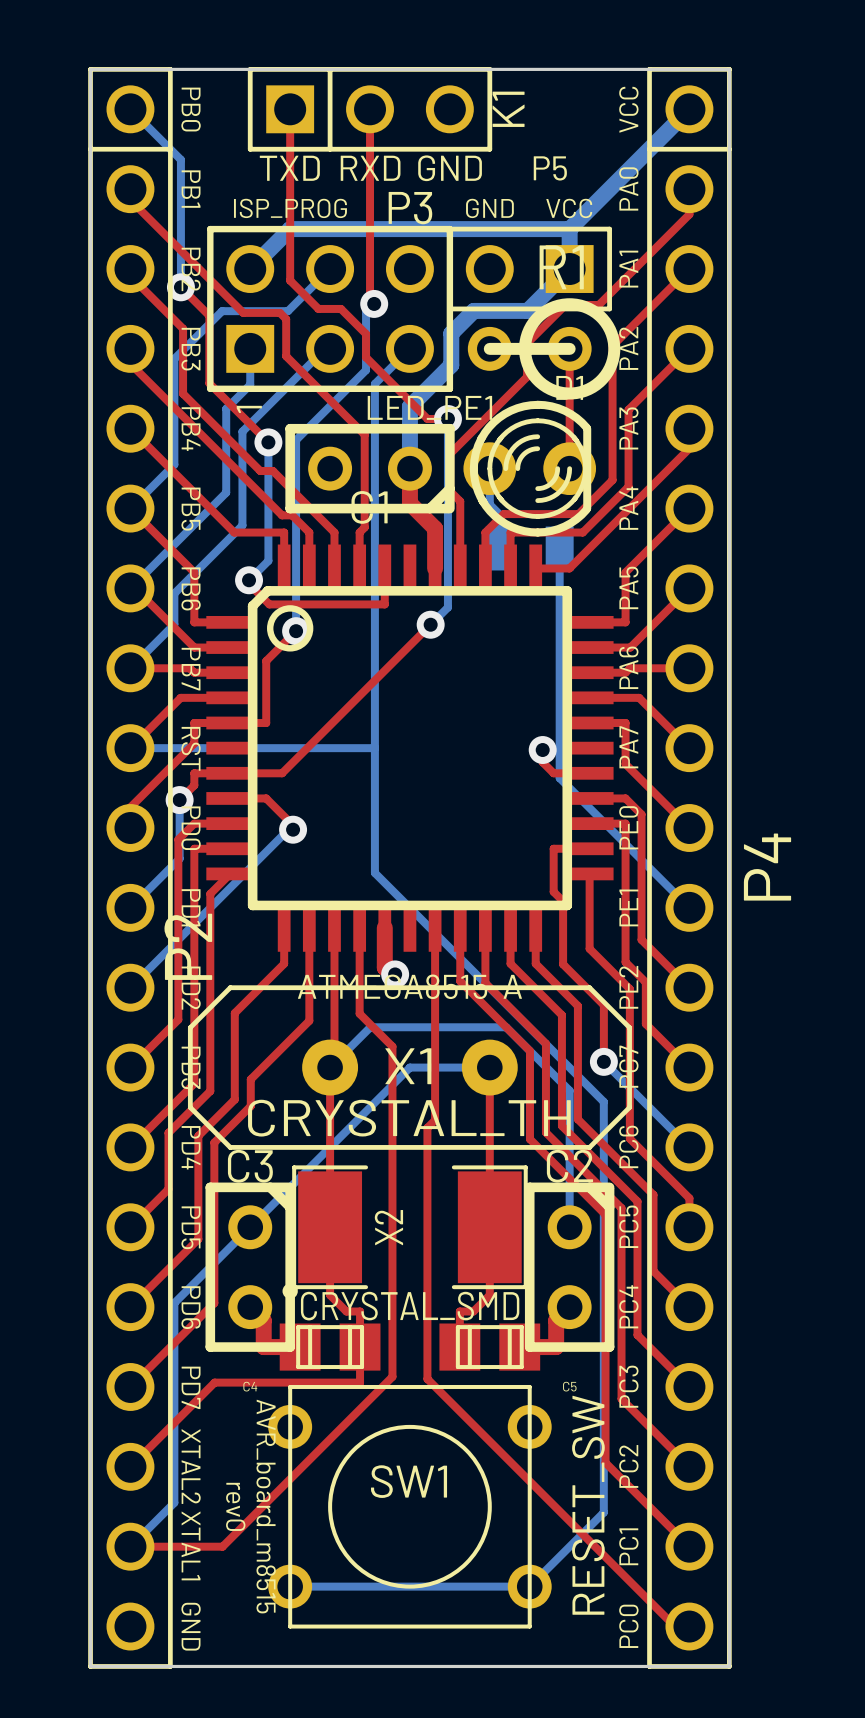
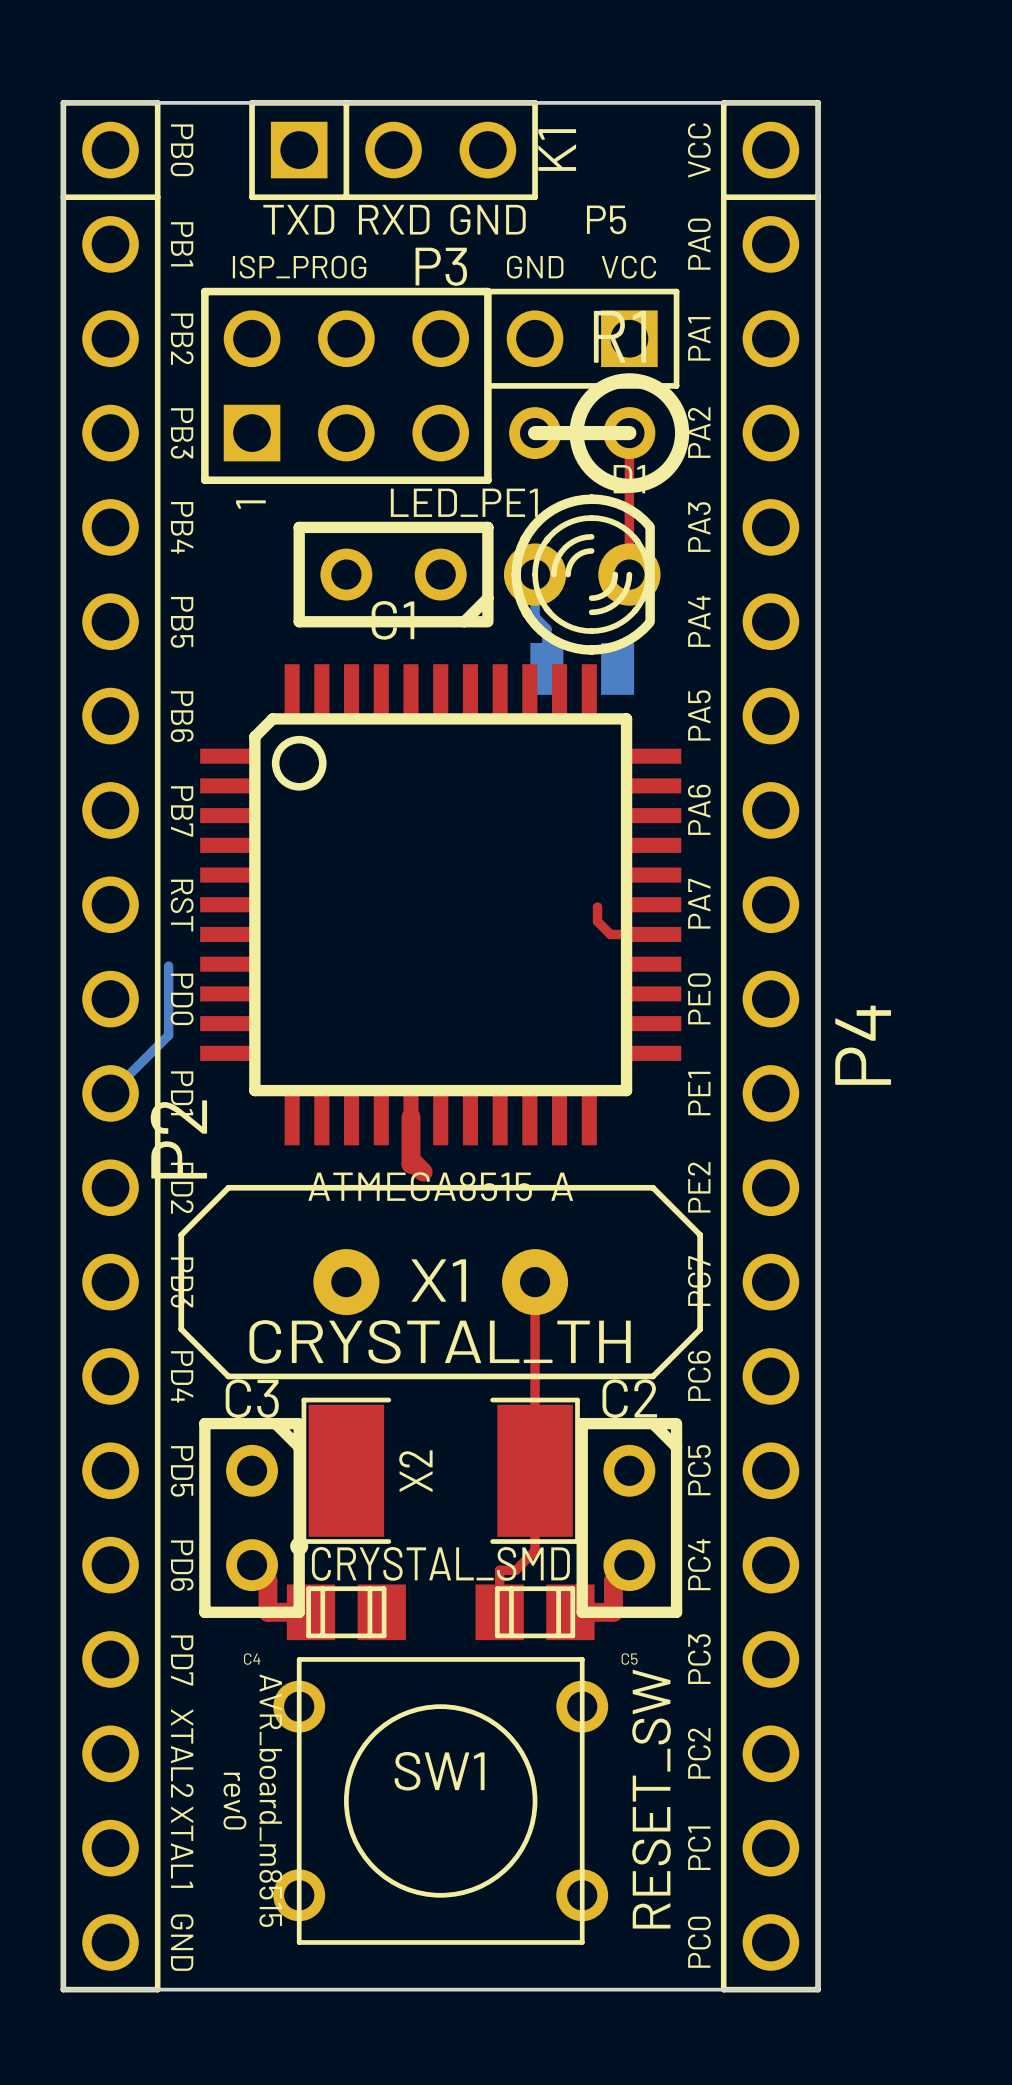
bottom track: (130, 109) (180, 159) (180, 287) -> none
top track: (290, 109) (290, 280) (318, 308) (340, 308) (366, 333) (366, 357) (427, 419) (447, 419) -> none
top track: (370, 109) (370, 299) (374, 303) -> none
bottom track: (689, 109) (569, 229) -> none
top track: (130, 189) (130, 200) (243, 312) (280, 312) (286, 319) (286, 356) (364, 434) (364, 527) (359, 532) (359, 568) -> none
top track: (689, 189) (689, 214) (598, 304) (565, 304) (527, 343) (527, 376) (450, 453) (450, 491) (460, 501) (460, 568) -> none
bottom track: (569, 229) (290, 229) (250, 269) -> none
bottom track: (569, 229) (569, 269) (527, 310) (473, 310) (451, 333) (451, 365) (409, 406) (409, 468) -> none
top track: (130, 269) (130, 276) (183, 328) (183, 393) (260, 471) (272, 471) (334, 532) (334, 568) -> none
bottom track: (330, 269) (287, 311) (222, 311) (174, 358) (174, 464) (130, 508) -> none
top track: (689, 269) (612, 345) (612, 480) (578, 514) (503, 514) (485, 532) (485, 568) -> none
top track: (180, 287) (209, 315) (209, 383) (268, 442) -> none
via: (180, 287) -> none
bottom track: (374, 303) (366, 312) (366, 370) (296, 440) (296, 631) -> none
via: (374, 303) -> none
top track: (130, 348) (130, 363) (282, 515) (292, 515) (309, 532) (309, 568) -> none
bottom track: (250, 348) (250, 384) (226, 408) (226, 492) (130, 588) -> none
bottom track: (330, 348) (325, 348) (242, 431) (242, 525) (174, 593) (174, 624) (130, 668) -> none
bottom track: (409, 348) (374, 383) (374, 872) (603, 1101) (603, 1512) (529, 1586) (290, 1586) -> none
top track: (689, 348) (628, 409) (628, 486) (582, 532) (510, 532) (510, 568) -> none
bottom track: (447, 419) (447, 607) (430, 624) -> none
via: (447, 419) -> none
top track: (130, 428) (234, 532) (284, 532) (284, 568) -> none
top track: (689, 428) (689, 448) (569, 568) (535, 568) -> none
bottom track: (268, 442) (268, 560) (249, 580) -> none
via: (268, 442) -> none
top track: (409, 468) (409, 503) (435, 528) (435, 568) -> none
top track: (130, 508) (194, 572) (194, 622) (230, 622) -> none
top track: (689, 508) (625, 572) (625, 622) (589, 622) -> none
bottom track: (559, 548) (559, 778) (689, 907) -> none
top track: (384, 568) (384, 604) (269, 604) (249, 584) (249, 580) -> none
via: (249, 580) -> none
top track: (130, 588) (135, 588) (194, 647) (230, 647) -> none
top track: (689, 588) (630, 647) (589, 647) -> none
top track: (430, 624) (282, 773) (194, 773) (194, 785) (179, 800) -> none
via: (430, 624) -> none
top track: (296, 631) (266, 661) (266, 722) (194, 722) (194, 743) (130, 807) (130, 828) -> none
via: (296, 631) -> none
top track: (130, 668) (189, 668) (194, 672) (230, 672) -> none
top track: (689, 668) (629, 668) (625, 672) (589, 672) -> none
top track: (230, 697) (180, 697) (130, 748) -> none
top track: (589, 697) (639, 697) (689, 748) -> none
top track: (589, 722) (625, 722) (625, 764) (689, 828) -> none
bottom track: (130, 748) (374, 748) -> none
via: (542, 750) -> none
top track: (230, 798) (266, 798) (293, 825) (293, 829) -> none
top track: (589, 798) (625, 798) (641, 814) (641, 939) (689, 987) -> none
via: (179, 800) -> none
top track: (230, 823) (194, 823) (178, 839) (178, 1019) (130, 1067) -> none
top track: (589, 823) (625, 823) (625, 962) (645, 982) (645, 1023) (689, 1067) -> none
bottom track: (293, 829) (288, 829) (130, 987) -> none
via: (293, 829) -> none
top track: (230, 848) (194, 848) (194, 1083) (130, 1147) -> none
top track: (589, 848) (553, 848) (553, 891) (563, 901) (563, 964) (603, 1005) (603, 1061) -> none
top track: (230, 873) (210, 893) (210, 1091) (168, 1132) (168, 1189) (130, 1227) -> none
top track: (589, 873) (589, 948) (629, 989) (629, 1138) (689, 1198) (689, 1227) -> none
top track: (284, 927) (284, 963) (234, 1013) (234, 1099) (198, 1136) (198, 1239) (130, 1307) -> none
top track: (309, 927) (309, 1020) (250, 1079) (250, 1106) (214, 1142) (214, 1303) (130, 1386) -> none
top track: (334, 927) (334, 1063) (330, 1067) (330, 1295) (346, 1311) (360, 1311) (360, 1382) (214, 1382) (130, 1466) -> none
top track: (359, 927) (359, 1013) (392, 1046) (392, 1376) (222, 1546) (130, 1546) -> none
top track: (435, 927) (435, 1120) (427, 1127) (427, 1378) (674, 1626) (689, 1626) -> none
top track: (460, 927) (460, 981) (529, 1051) (529, 1139) (605, 1214) (605, 1462) (689, 1546) -> none
top track: (485, 927) (485, 983) (545, 1043) (545, 1132) (621, 1208) (621, 1398) (689, 1466) -> none
top track: (510, 927) (510, 963) (561, 1015) (561, 1125) (637, 1201) (637, 1335) (689, 1386) -> none
top track: (535, 927) (535, 963) (577, 1005) (577, 1119) (653, 1194) (653, 1271) (689, 1307) -> none
via: (395, 974) -> none
bottom track: (603, 1061) (689, 1147) -> none
via: (603, 1061) -> none
bottom track: (330, 1067) (370, 1027) (506, 1027) (569, 1090) (569, 1227) -> none
bottom track: (489, 1067) (409, 1067) (174, 1303) (174, 1502) (130, 1546) -> none

